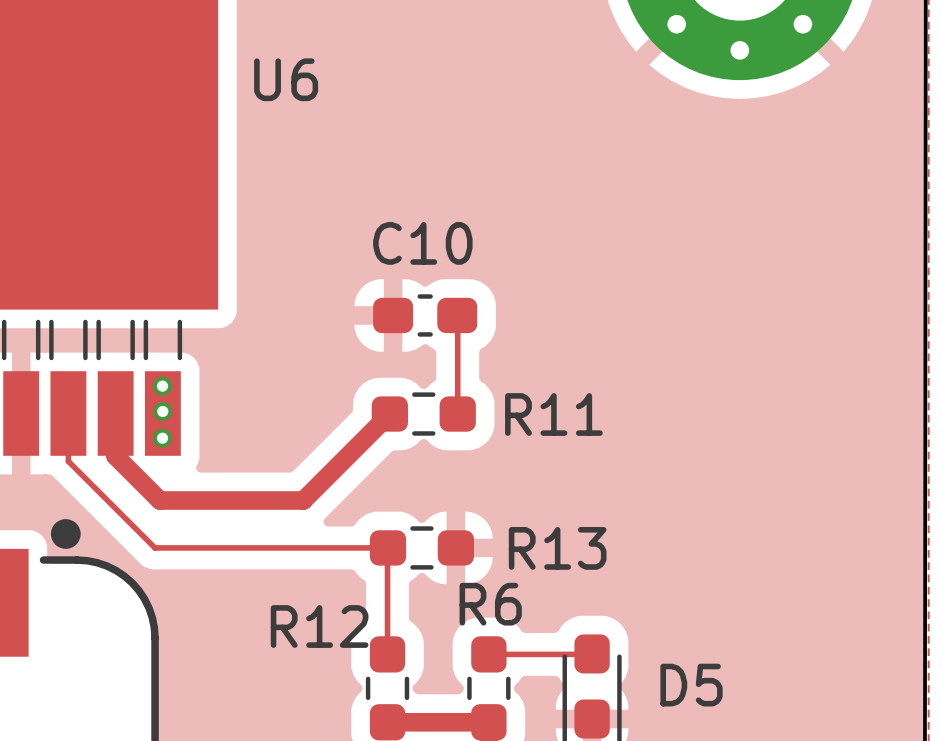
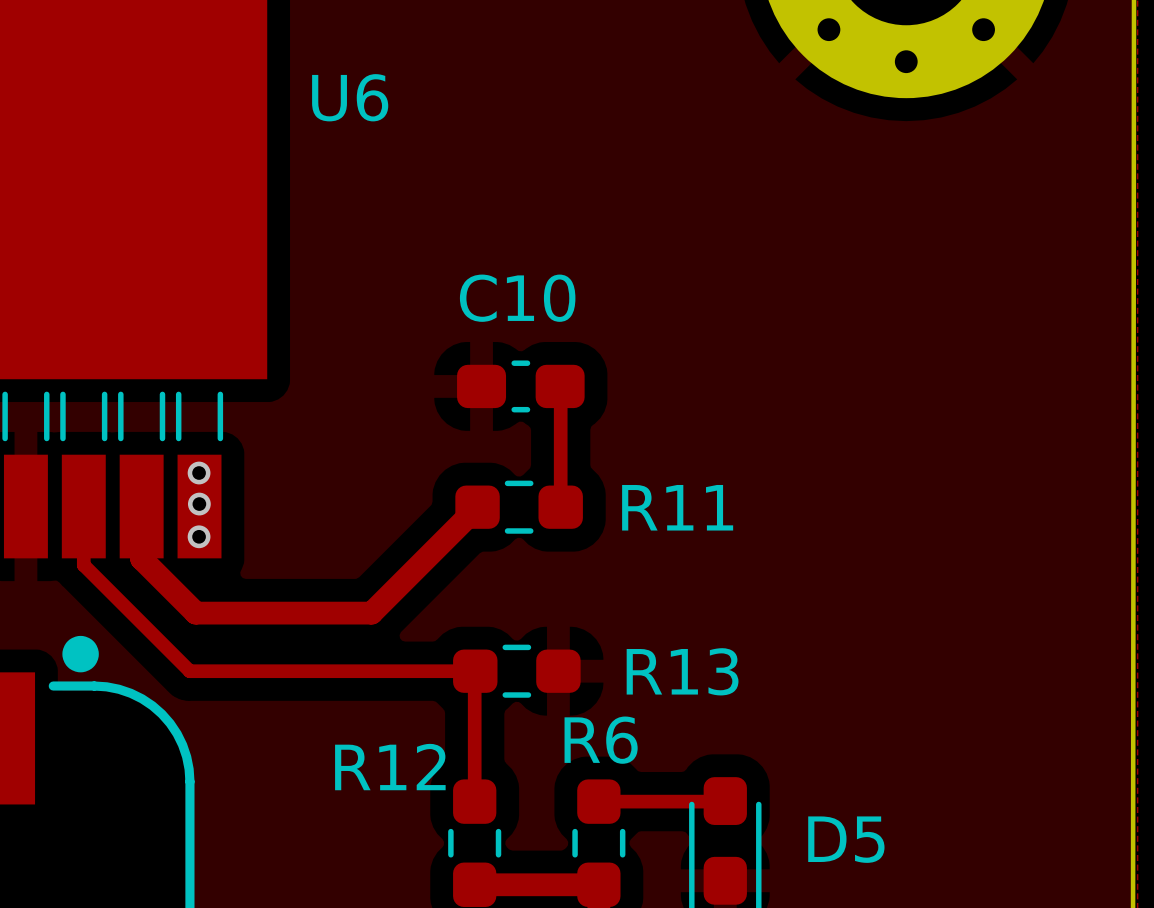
track width: thin (457, 315) (457, 414) -> thick (560, 387) (560, 507)
track width: thin (68, 413) (68, 461) (154, 547) (387, 547) -> thick (83, 506) (83, 565) (189, 671) (475, 671)
track width: thin (387, 548) (387, 654) -> thick (474, 671) (474, 801)
track width: thin (488, 654) (591, 654) -> thick (598, 801) (724, 801)

